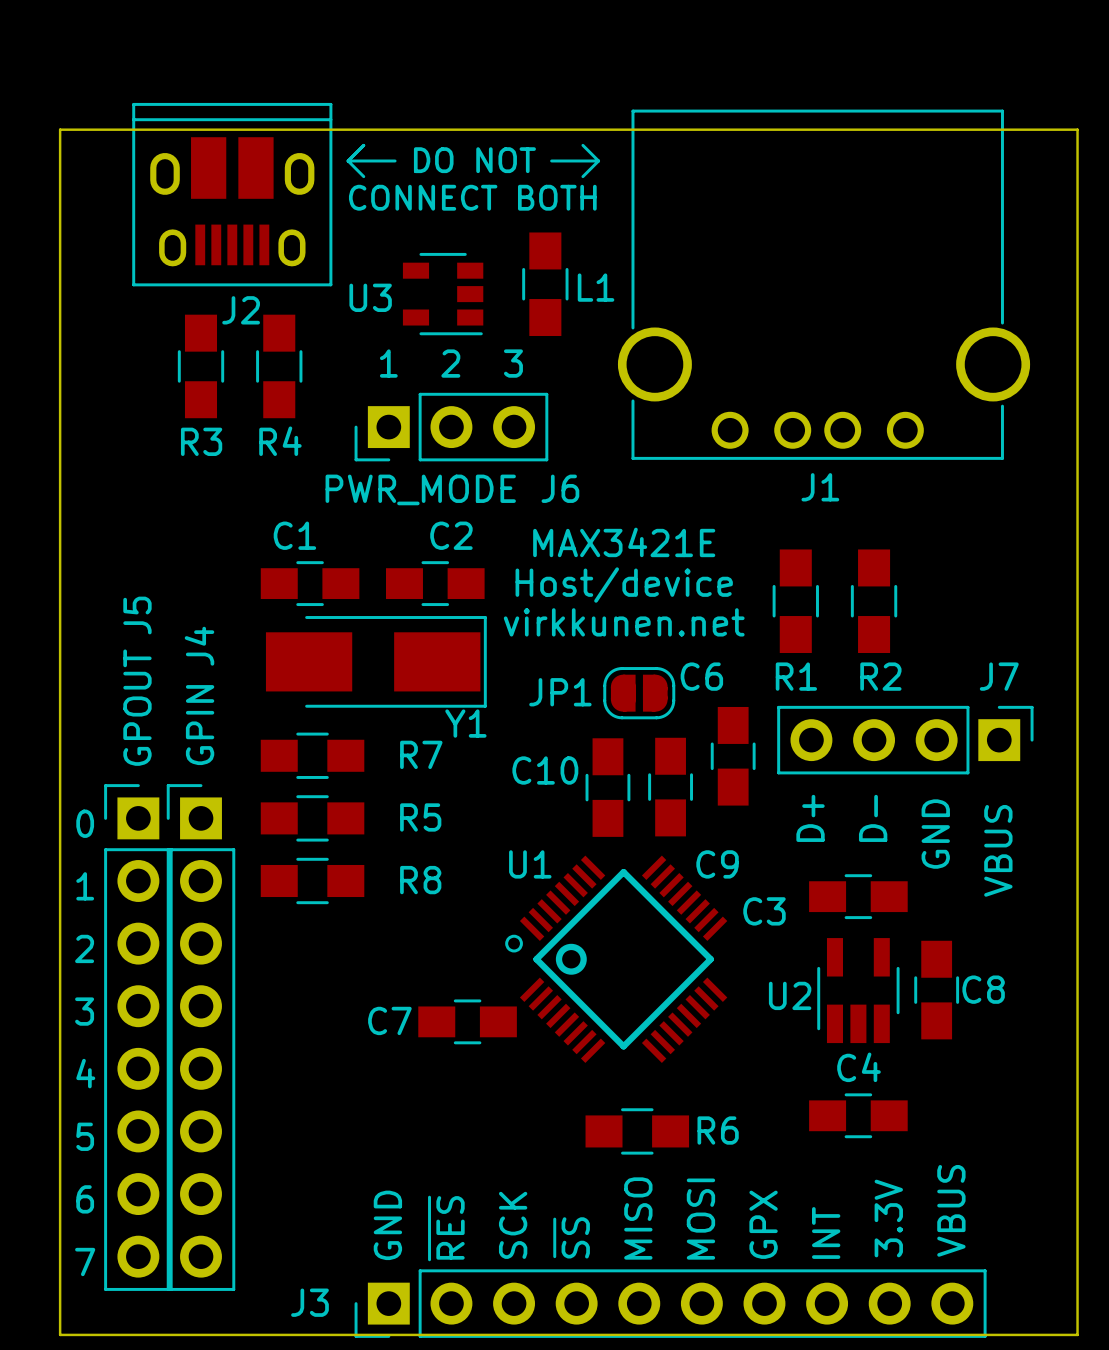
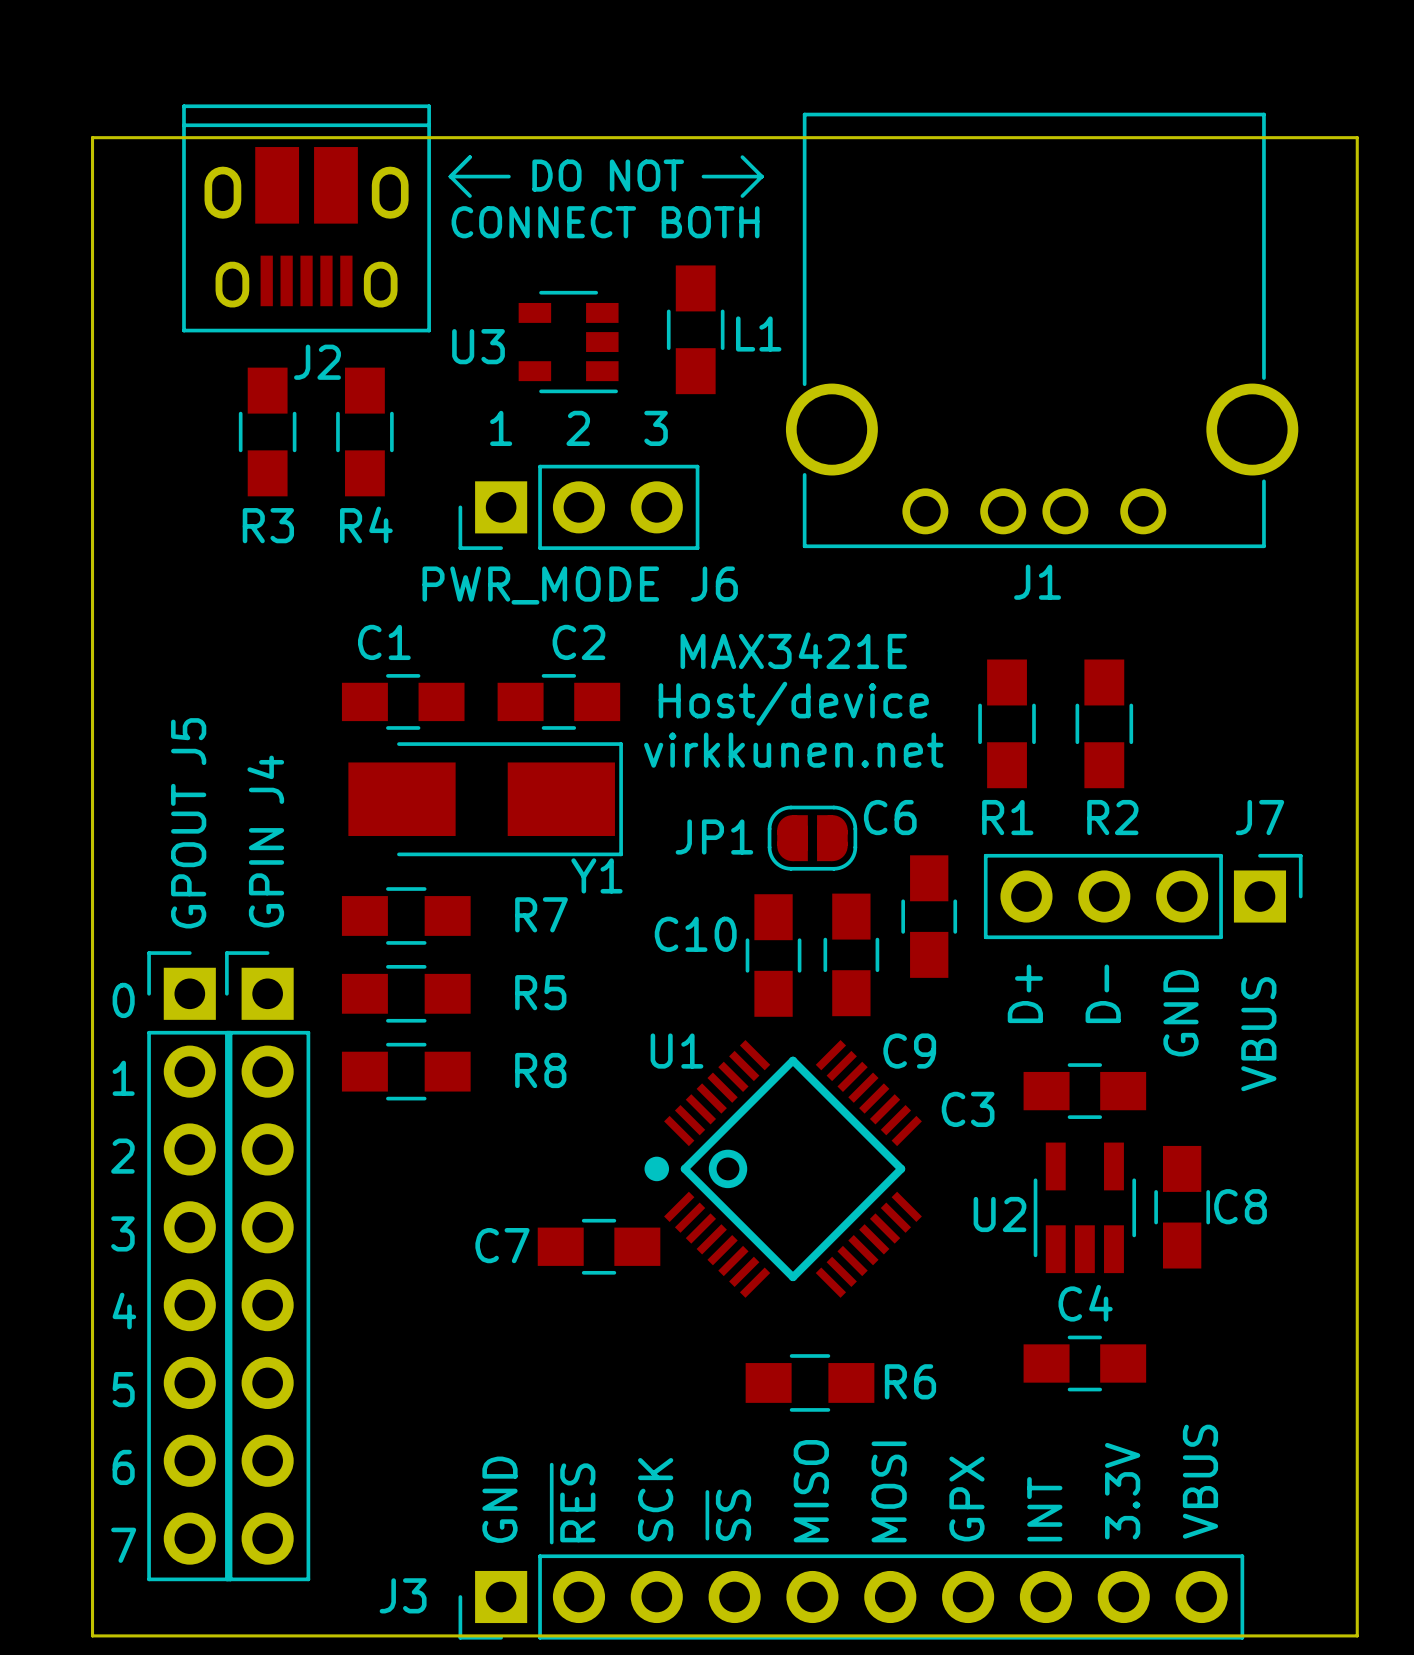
drawing shape: [505, 934, 523, 953] -> [644, 1156, 670, 1182]

